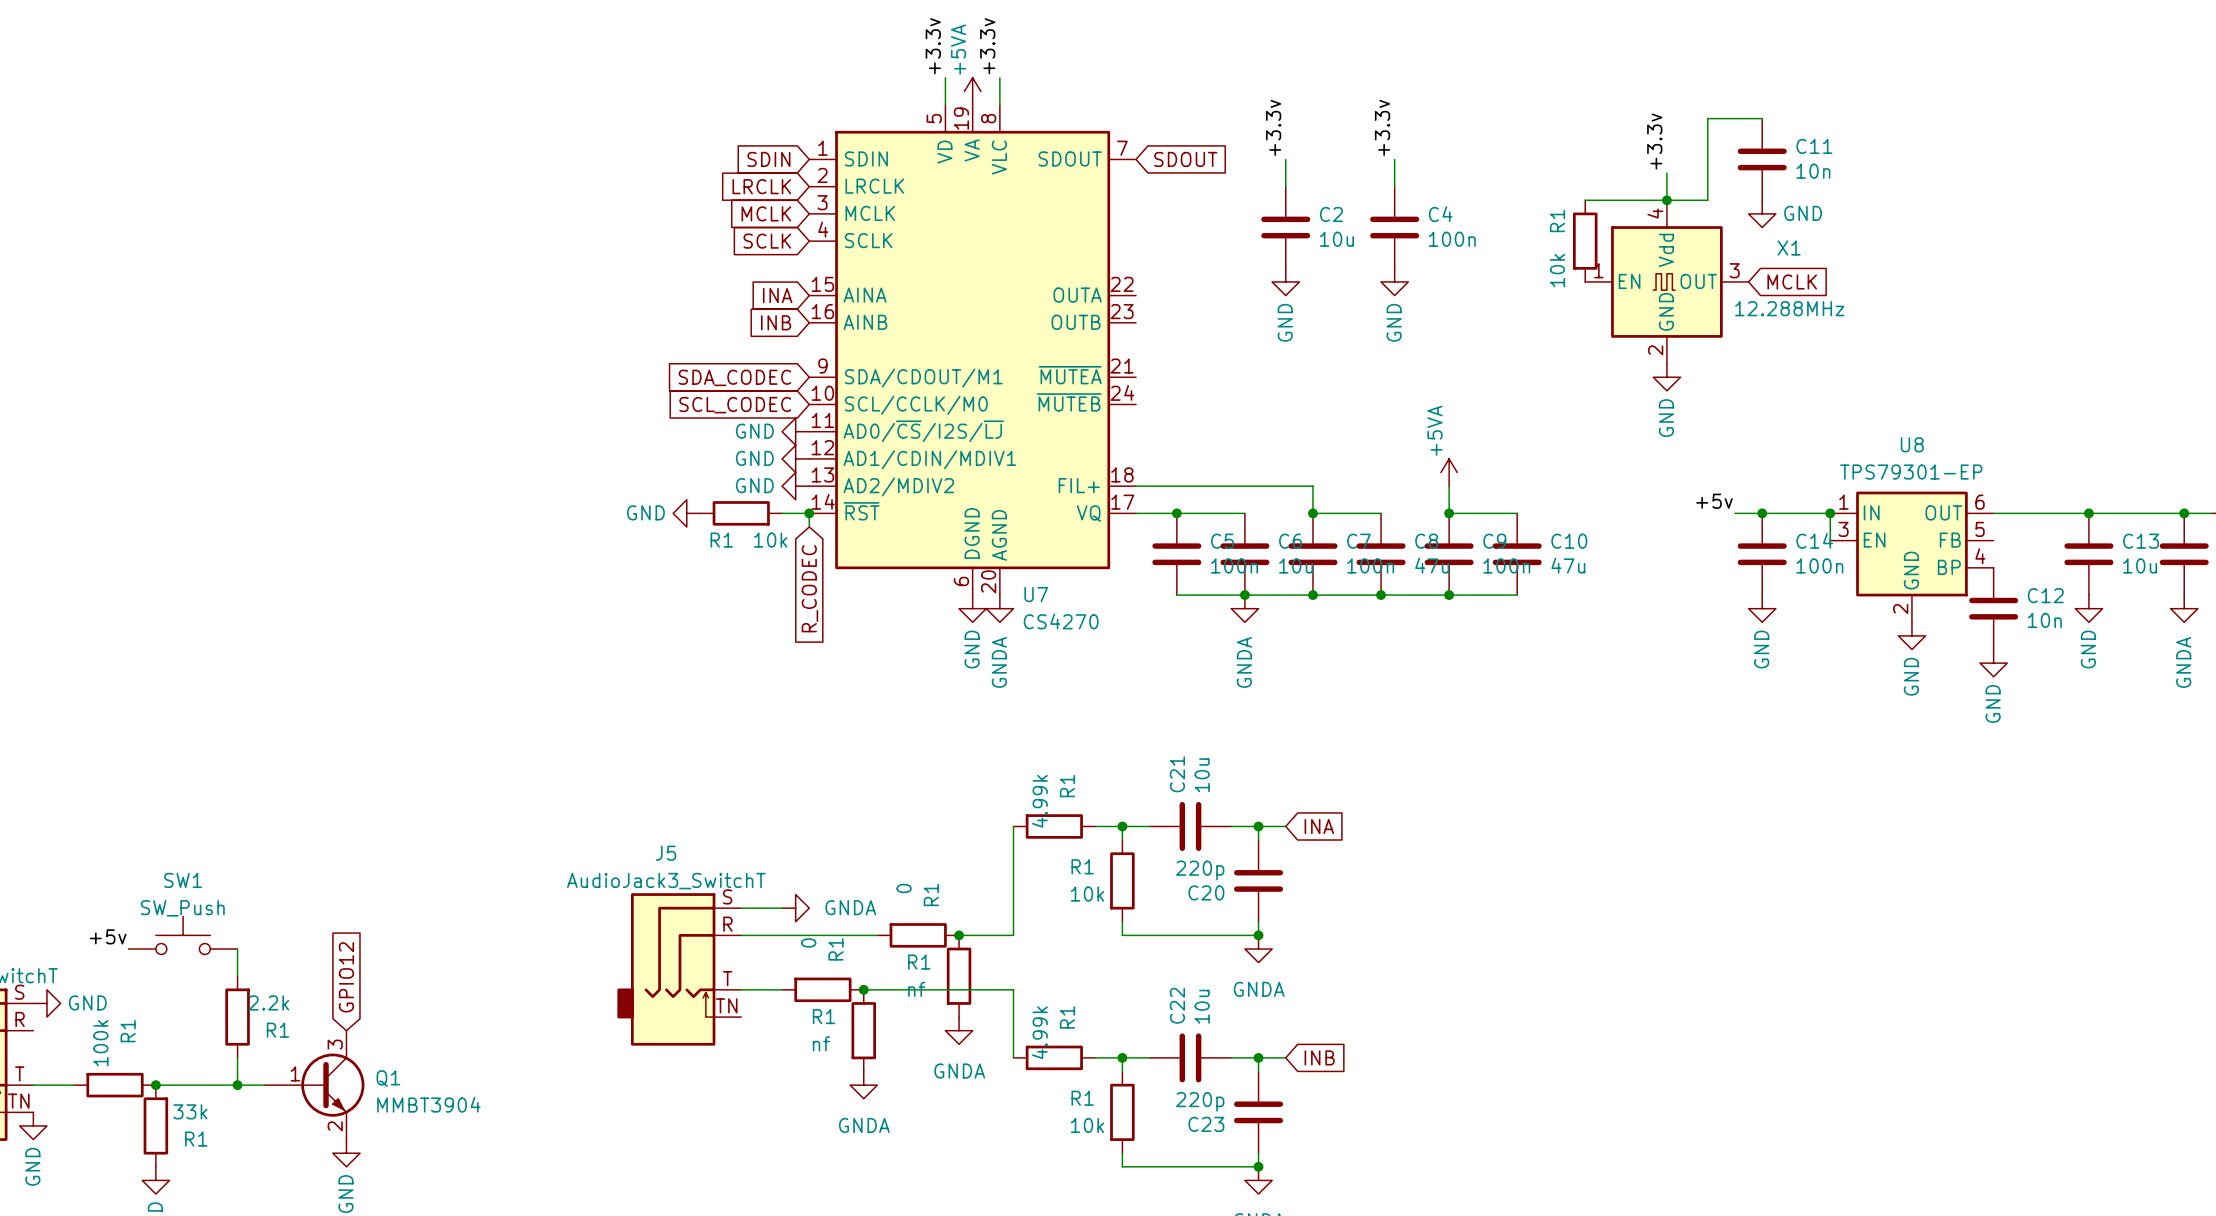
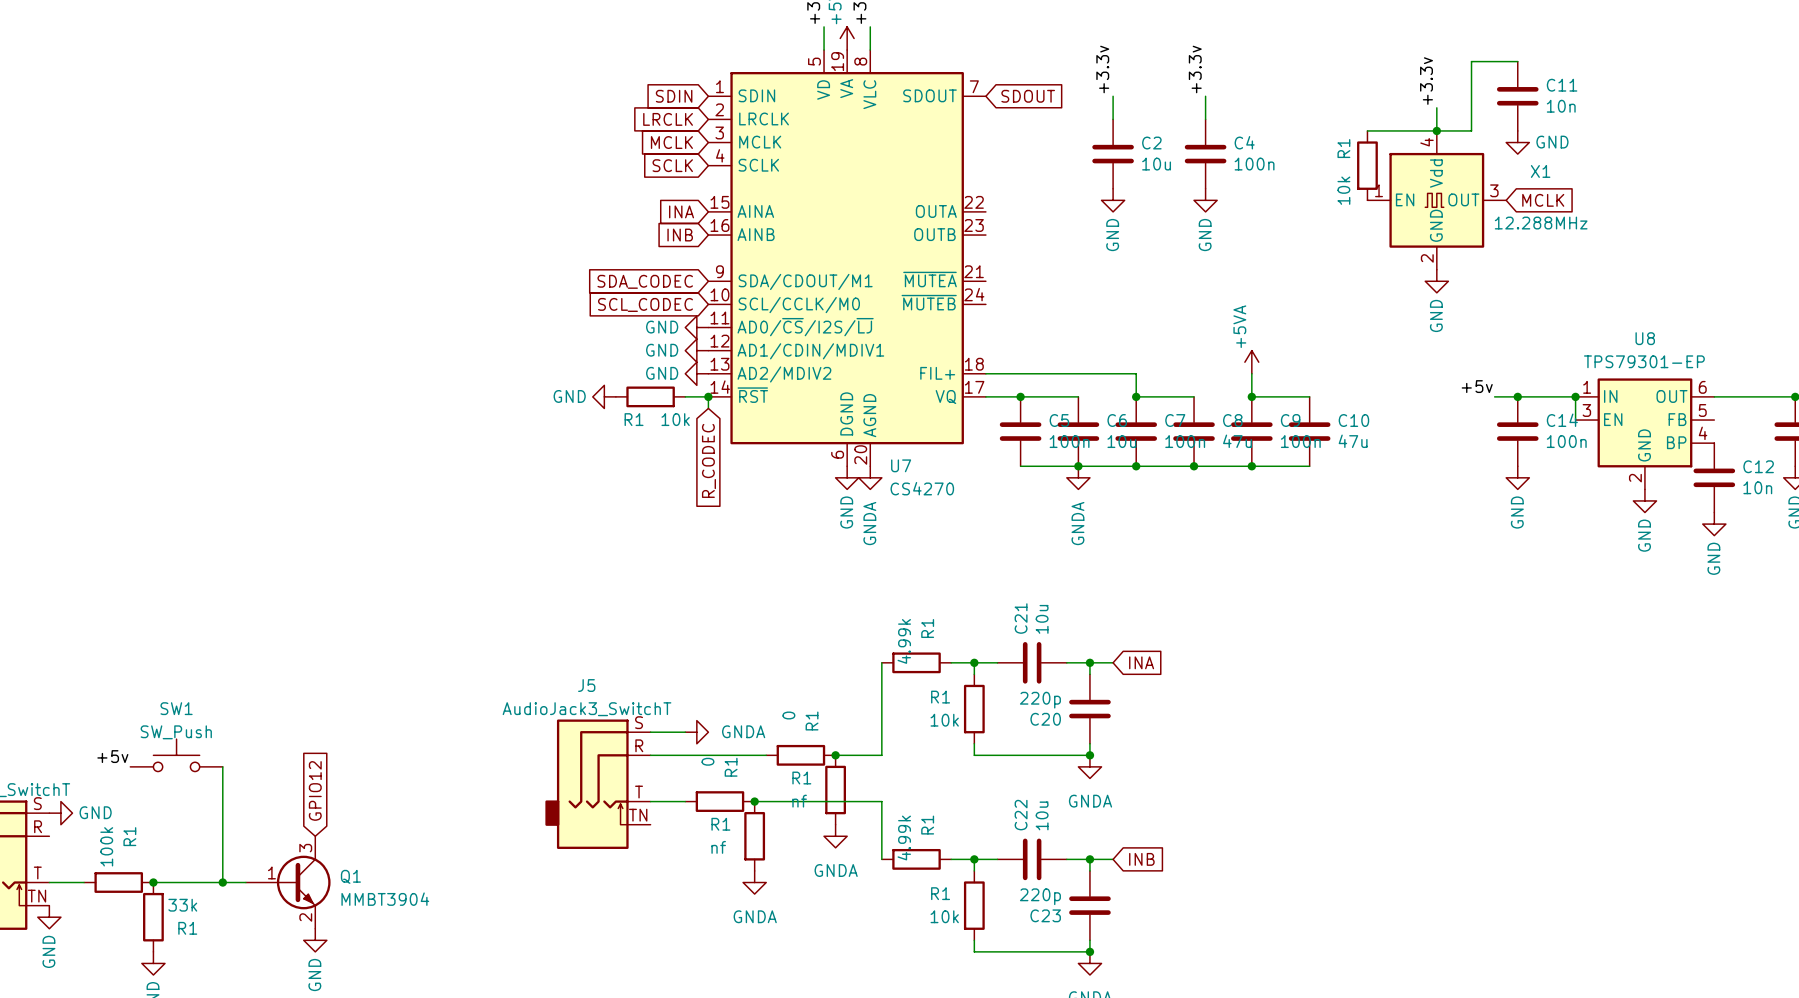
wire: none -> (222, 790) (222, 859)
R1: 2.2k (237, 1017) -> none

